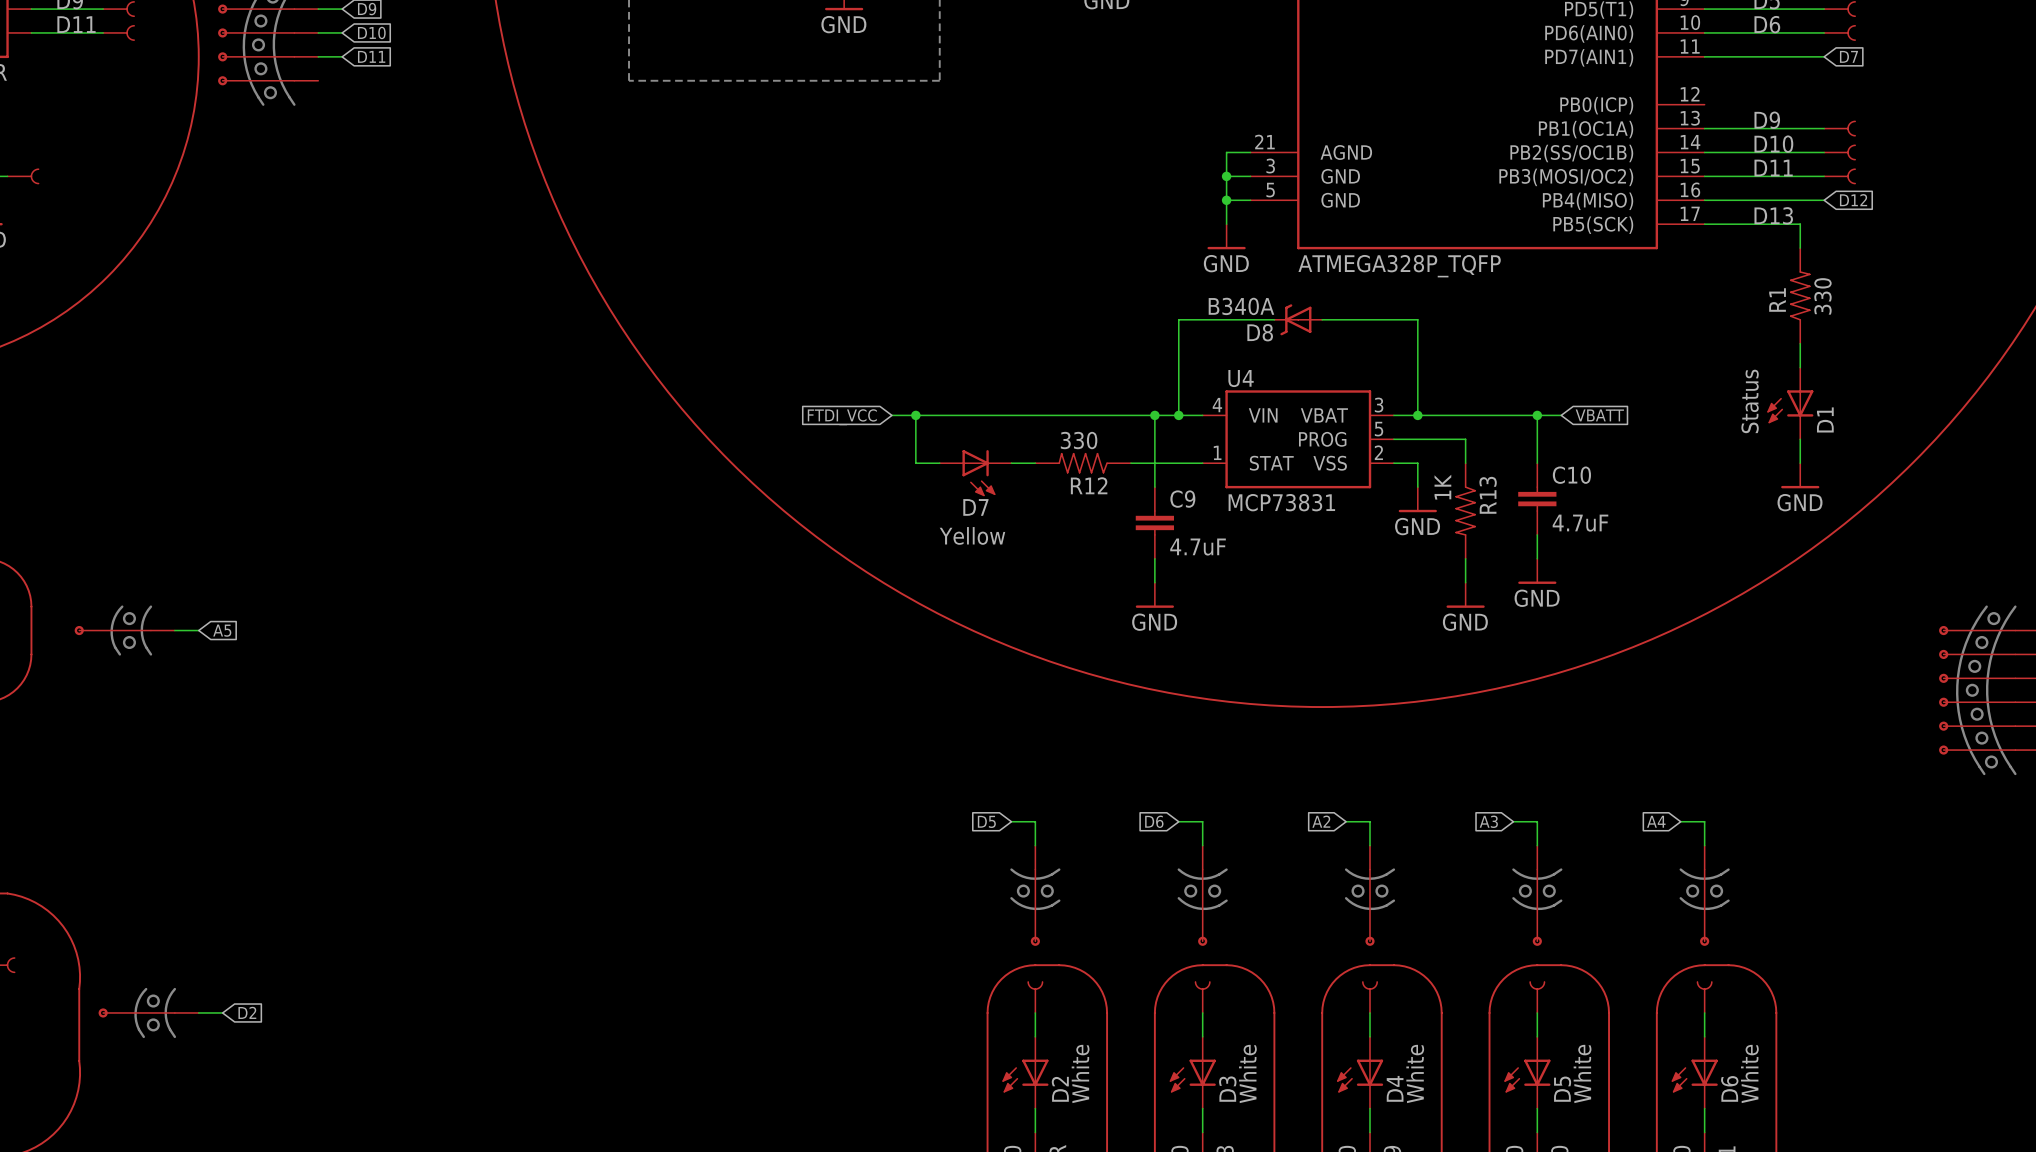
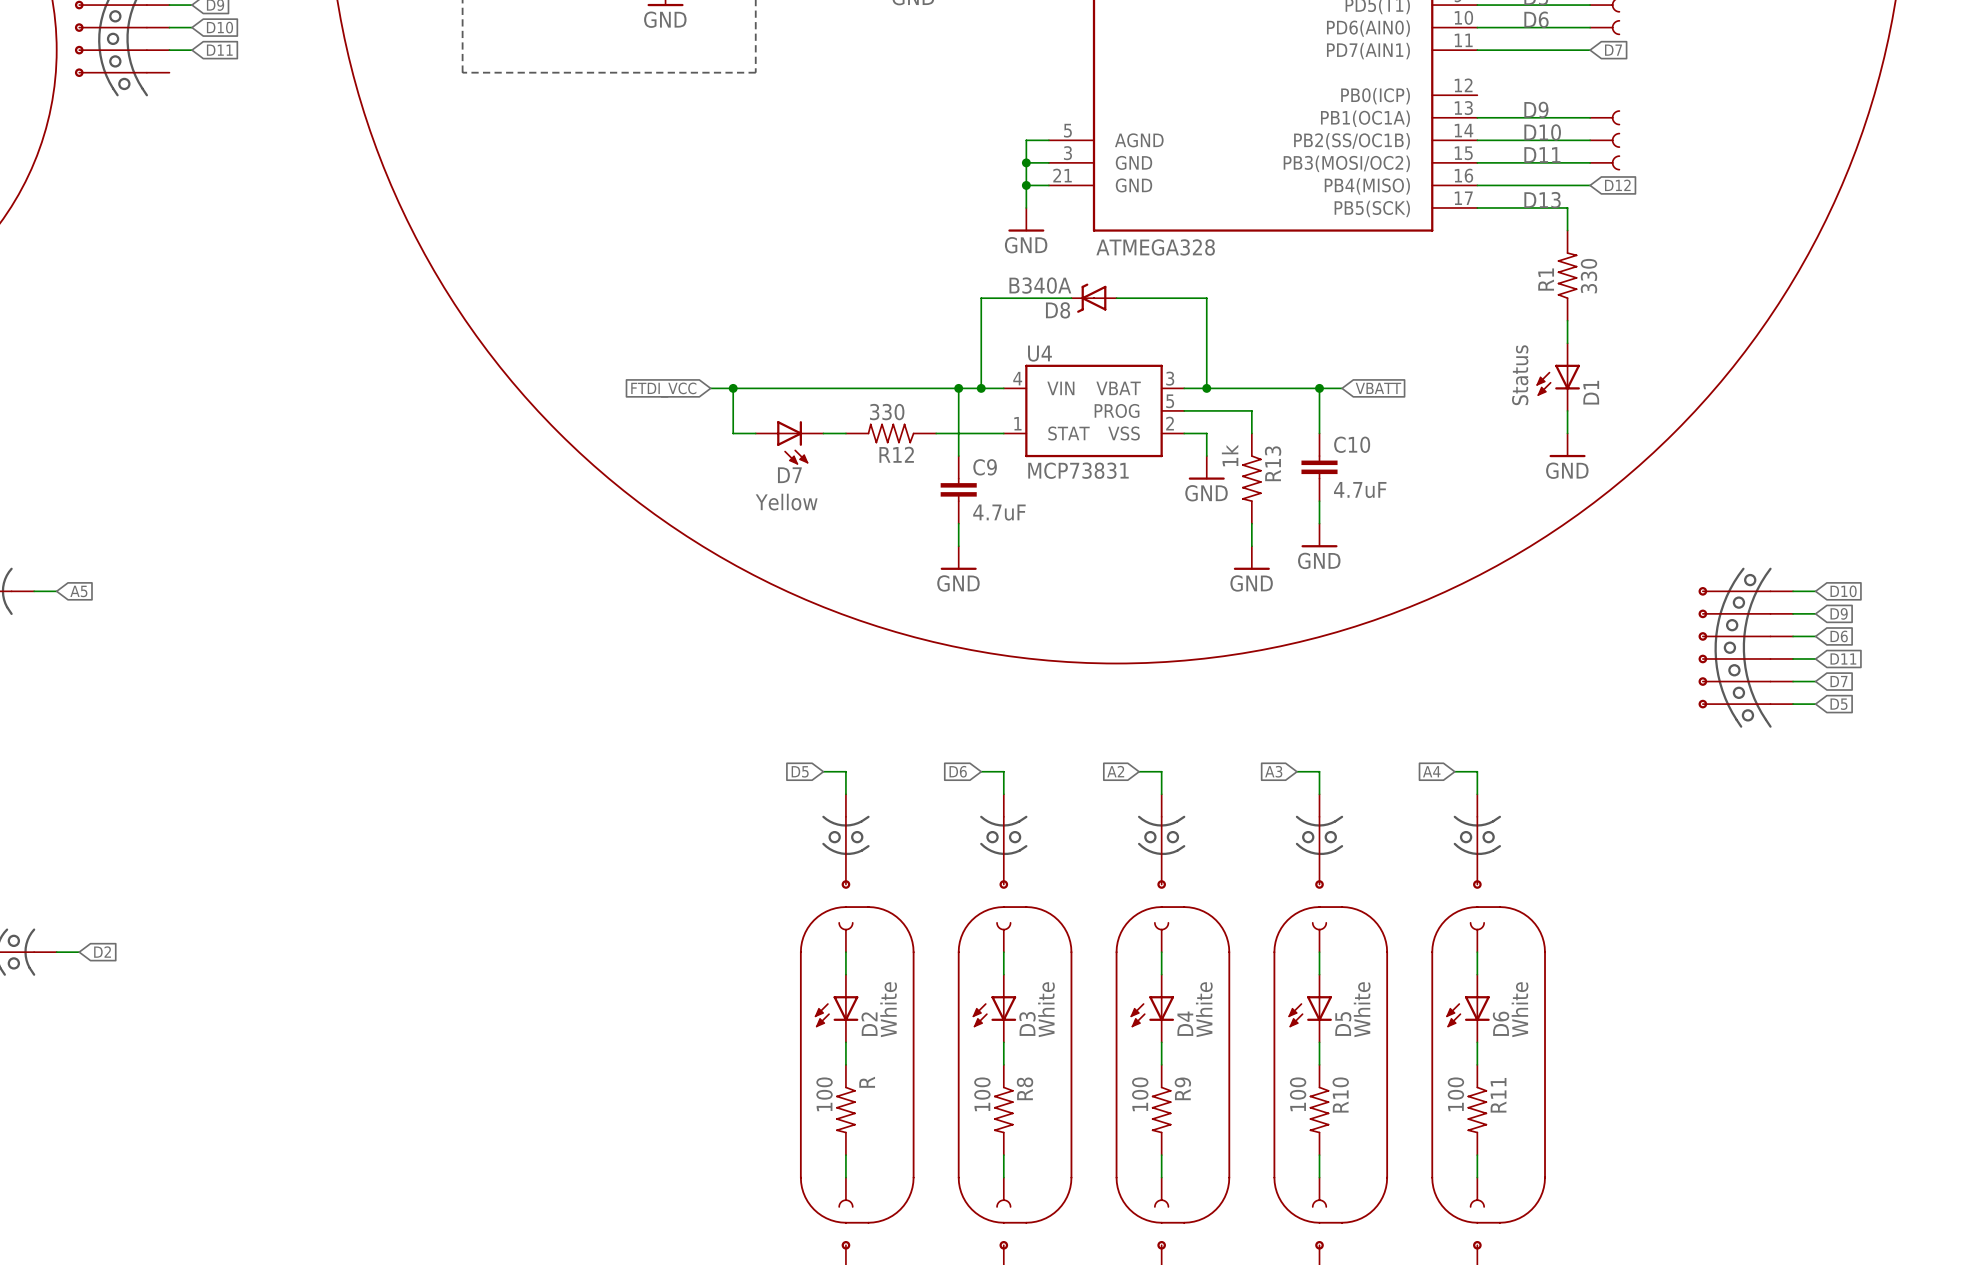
part pin number: 21 (1264, 142) -> 5 (1067, 130)
part pin number: 5 (1270, 190) -> 21 (1062, 175)
part value: ATMEGA328P_TQFP (1399, 266) -> ATMEGA328 (1155, 247)
R13 value: 1K (1442, 487) -> 1k (1230, 455)

